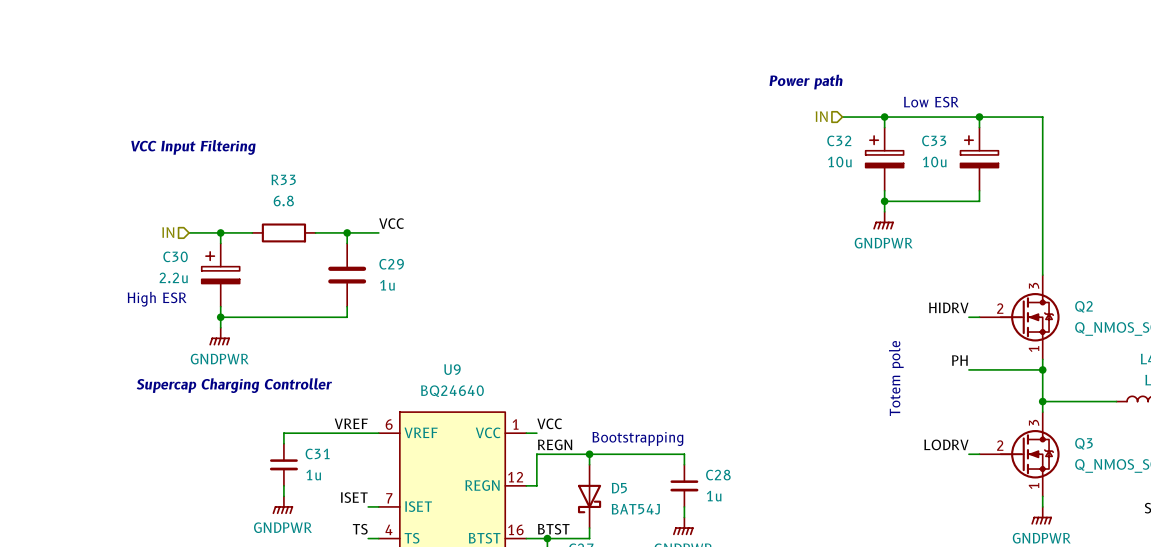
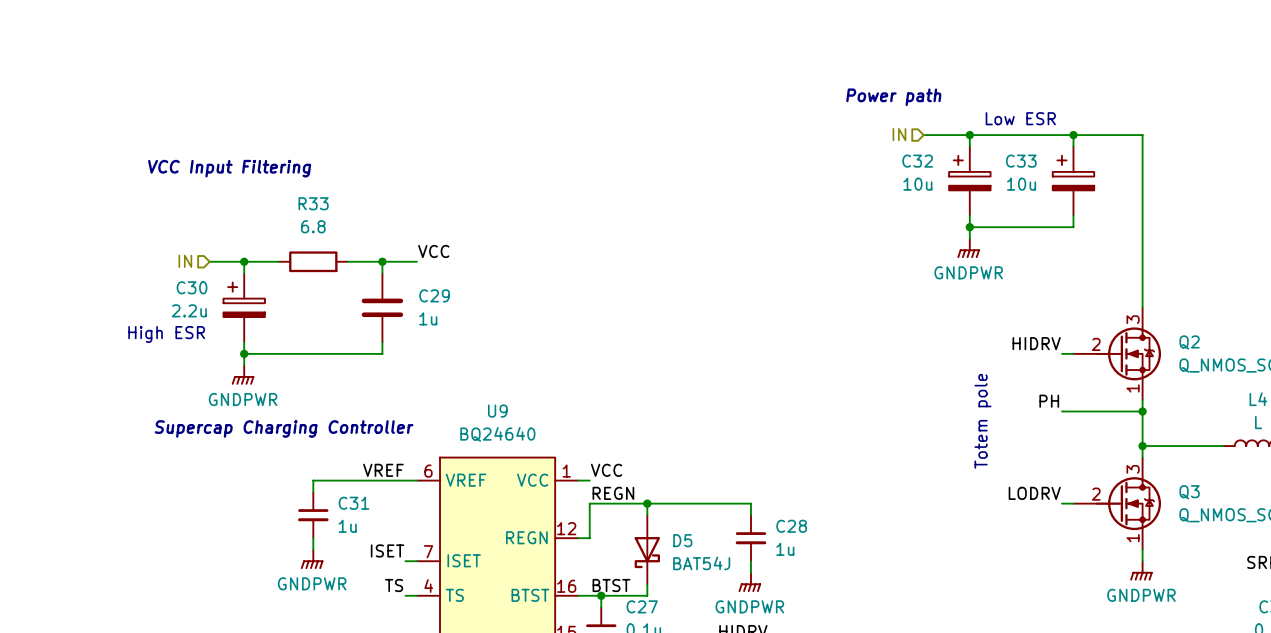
text: Bootstrapping (637, 439) -> none

